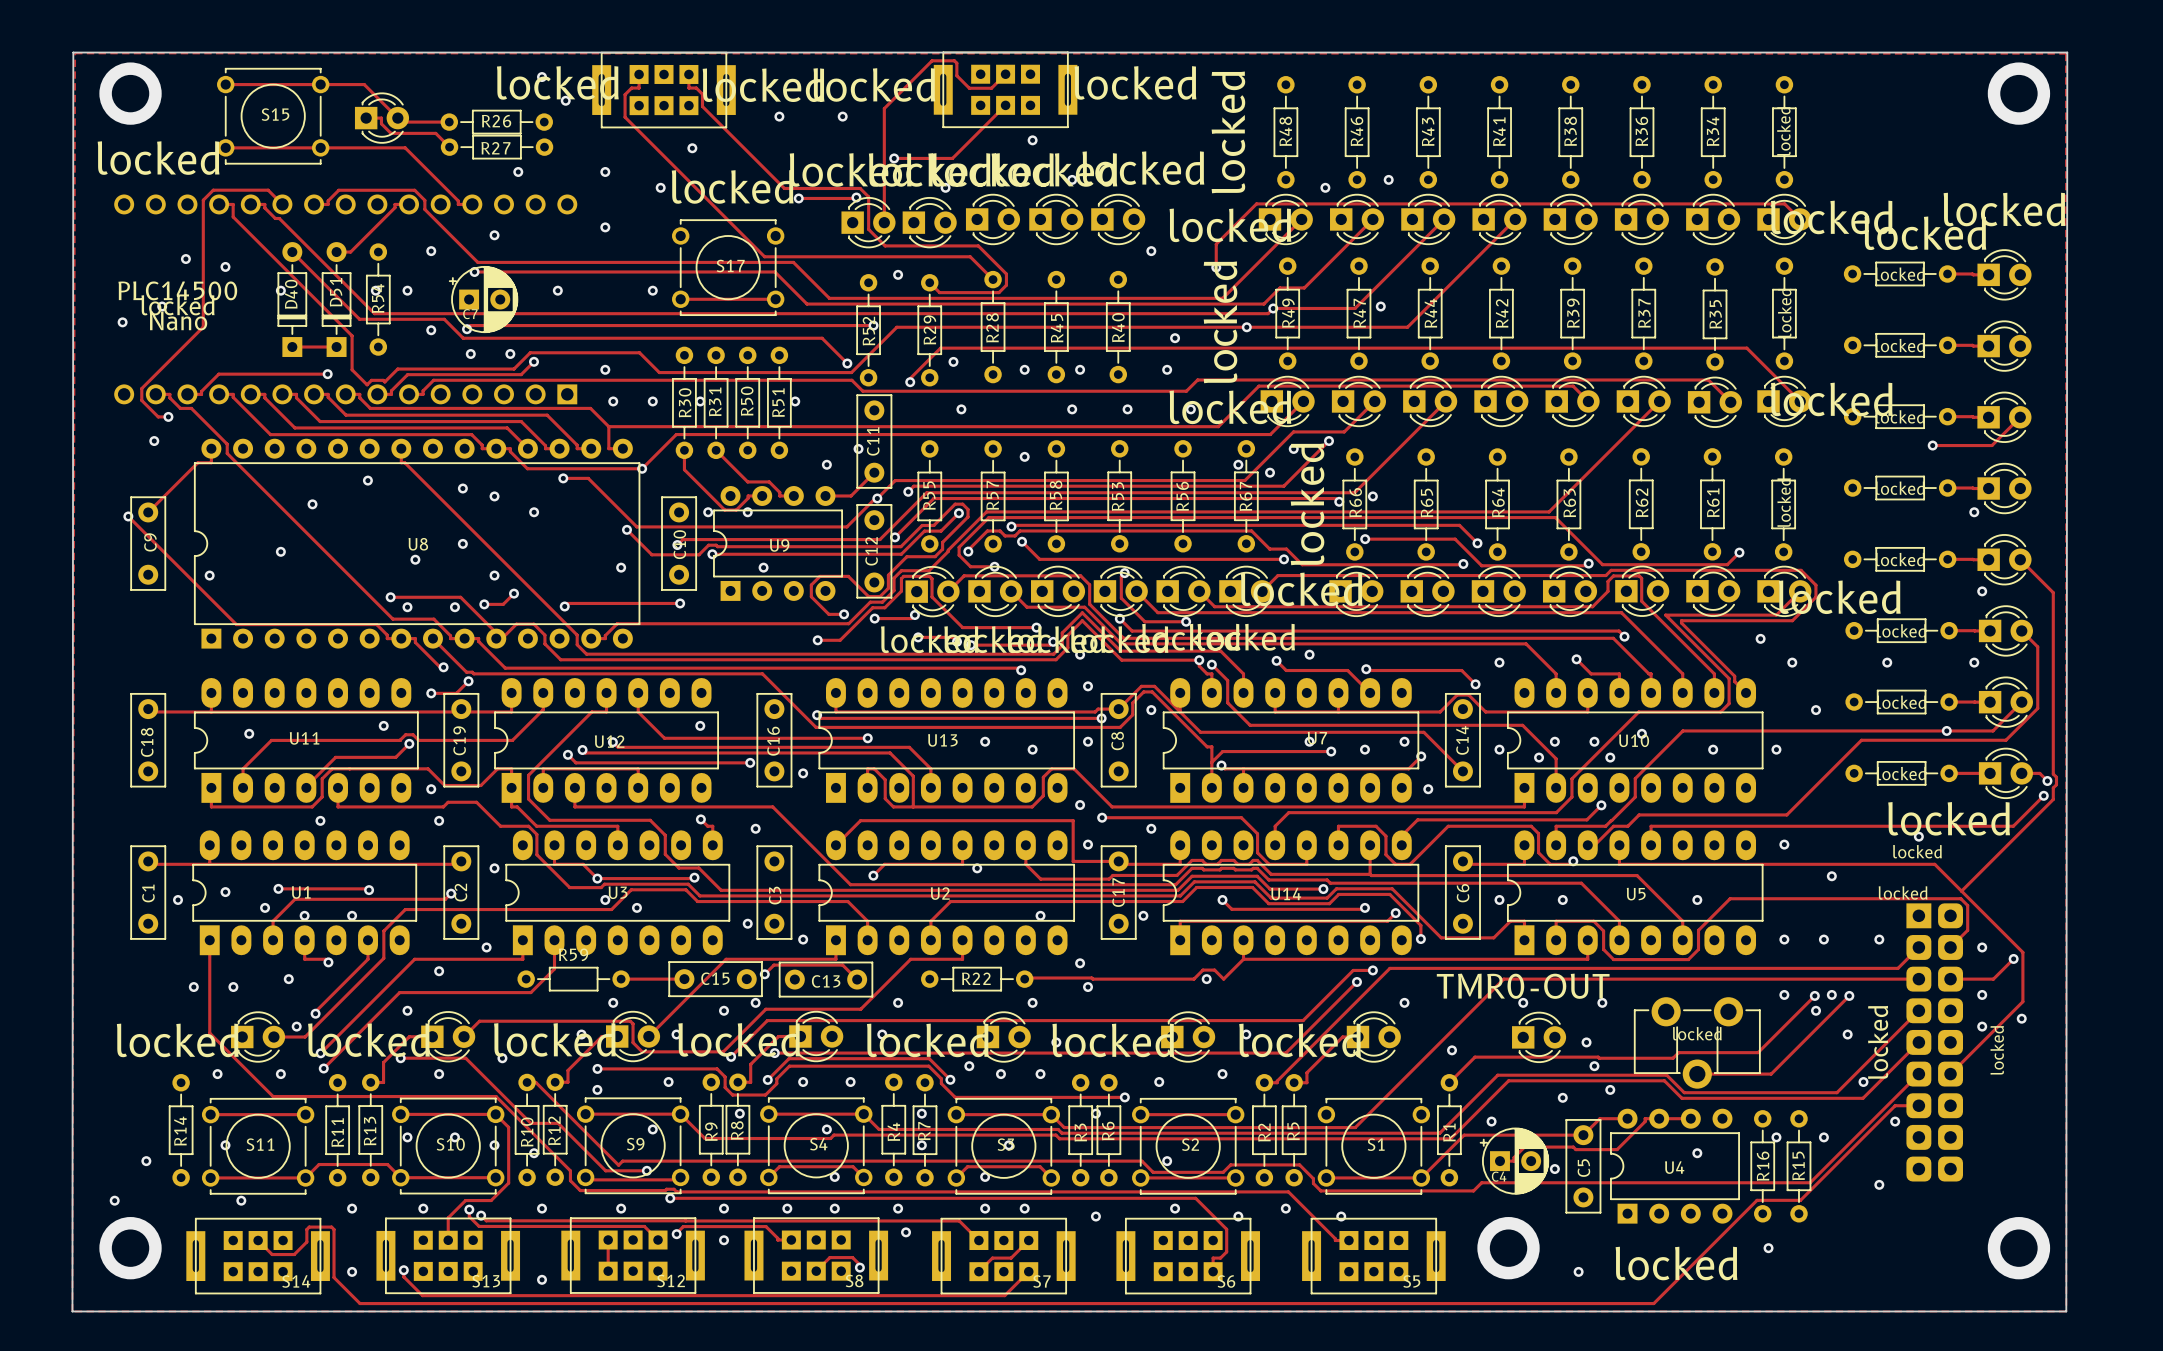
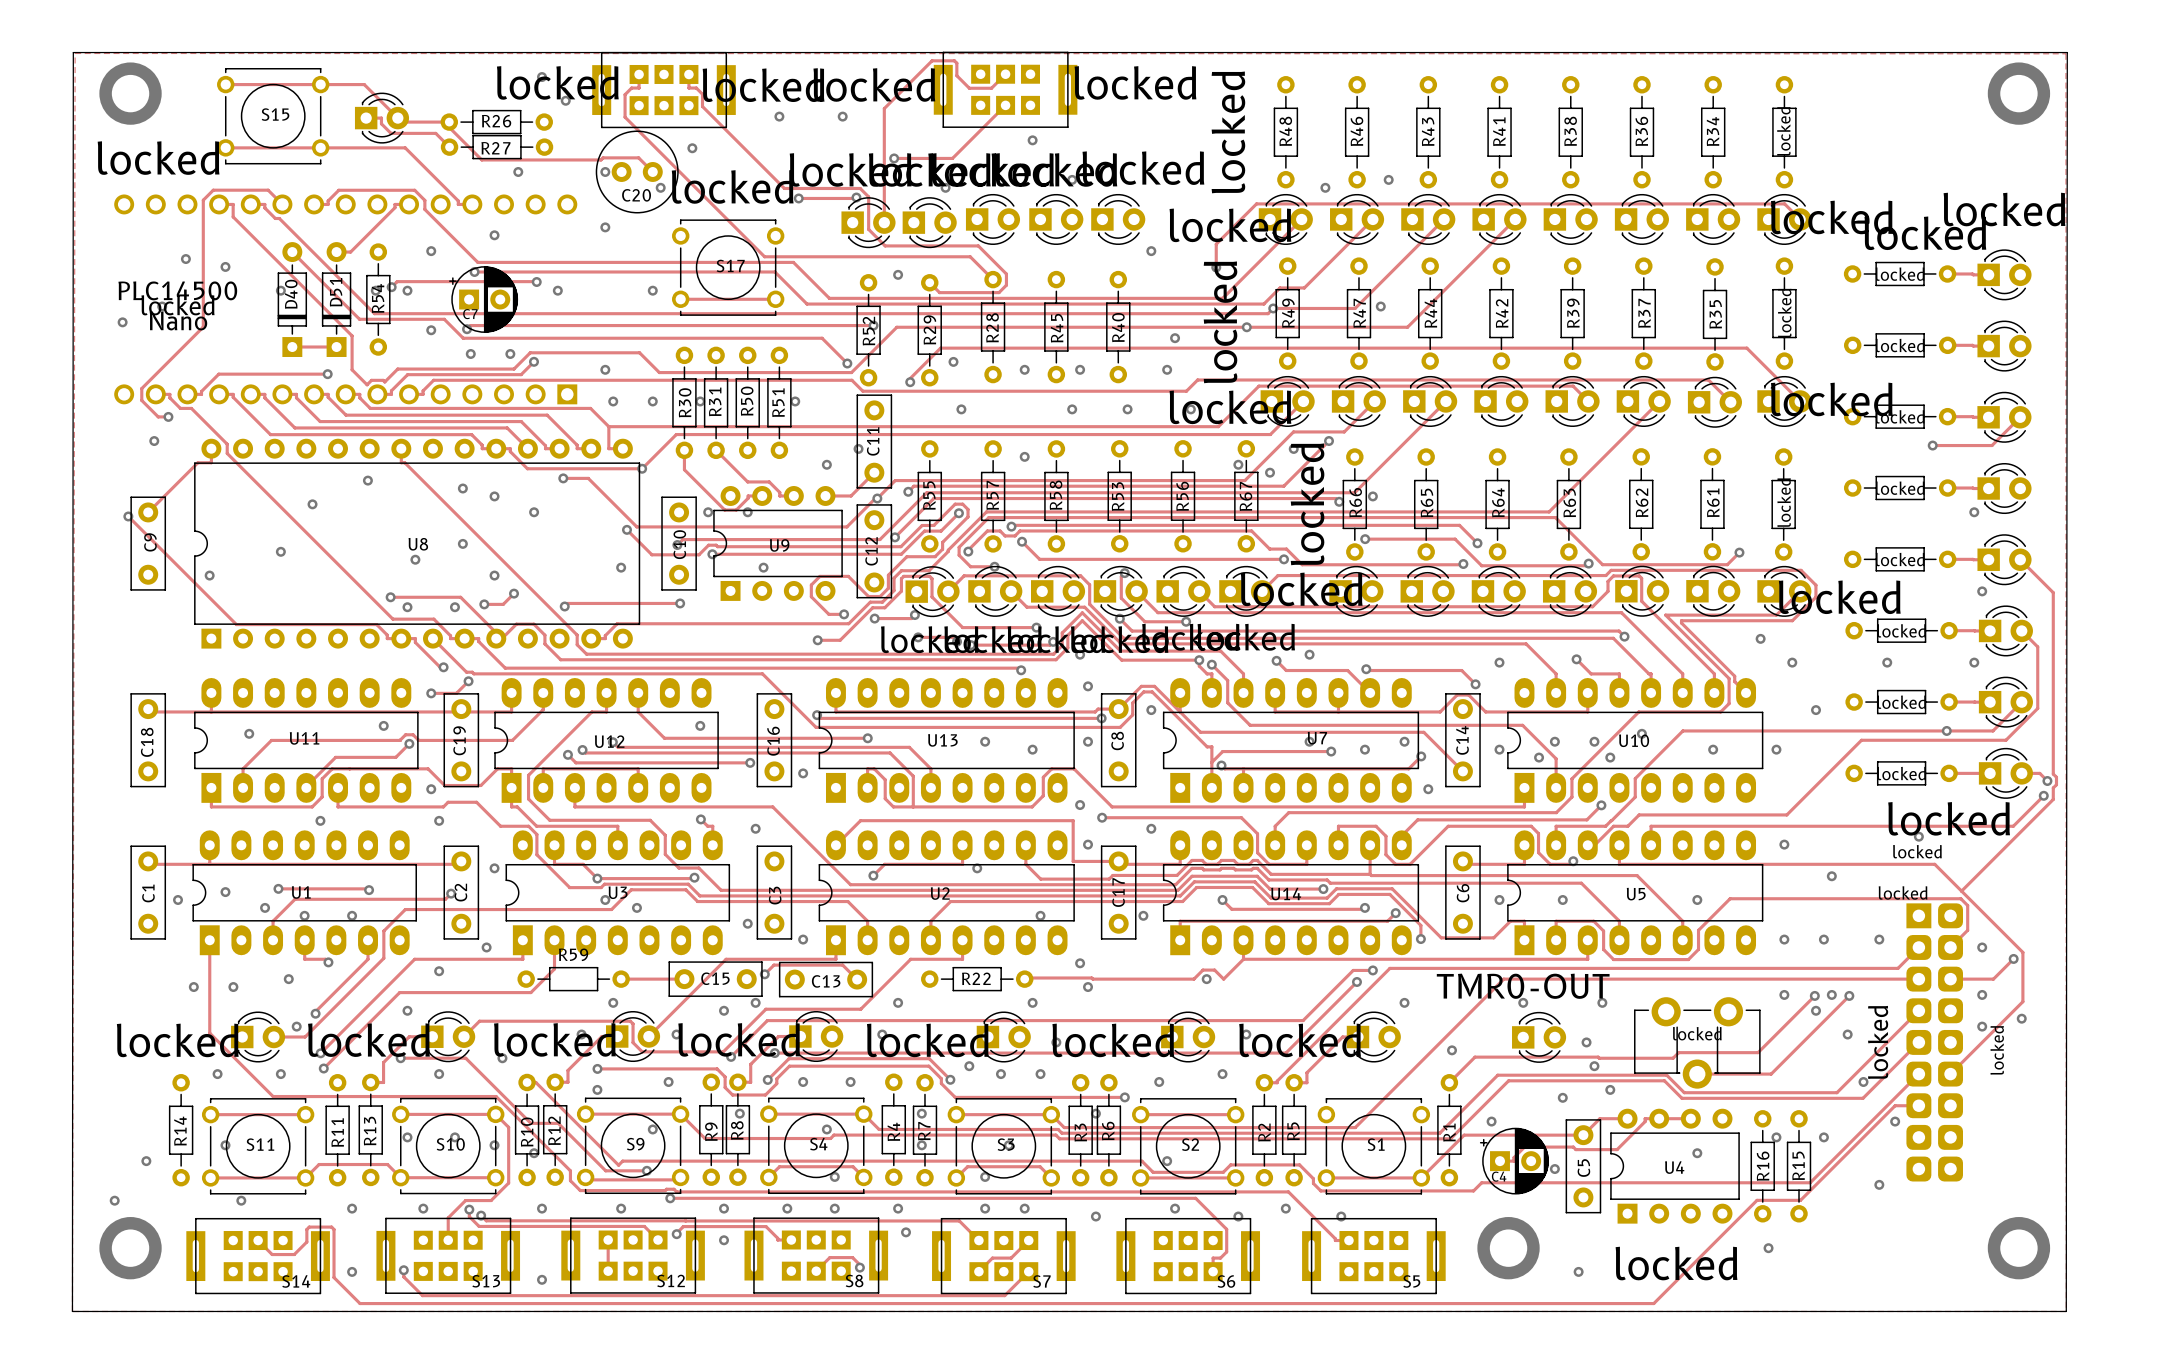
track: none -> (443, 122) (481, 159) (601, 159) (603, 157) (638, 157) (652, 171)
C20: none -> (637, 171)
track: none -> (536, 282) (397, 281) (391, 287)
via: none -> (536, 282)
via: none -> (391, 287)

